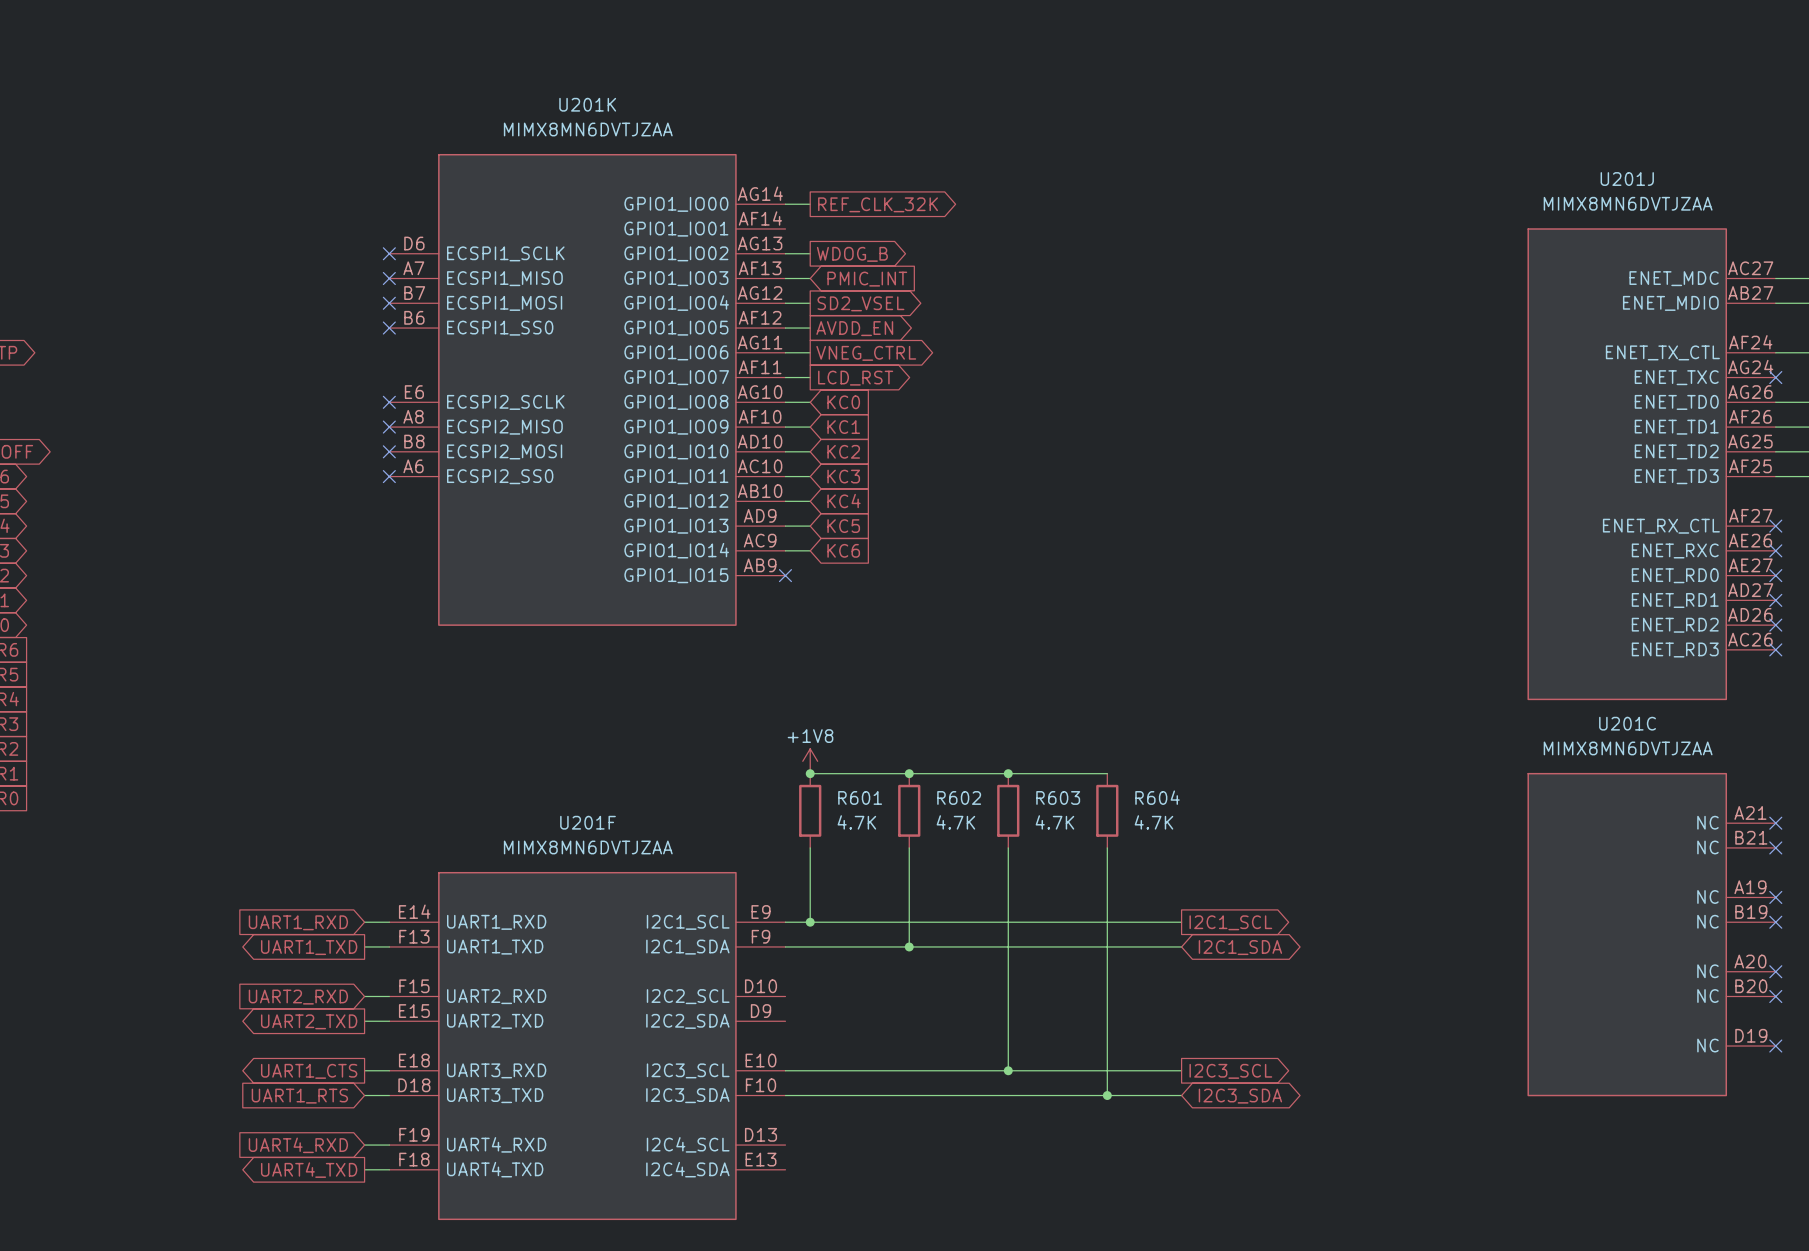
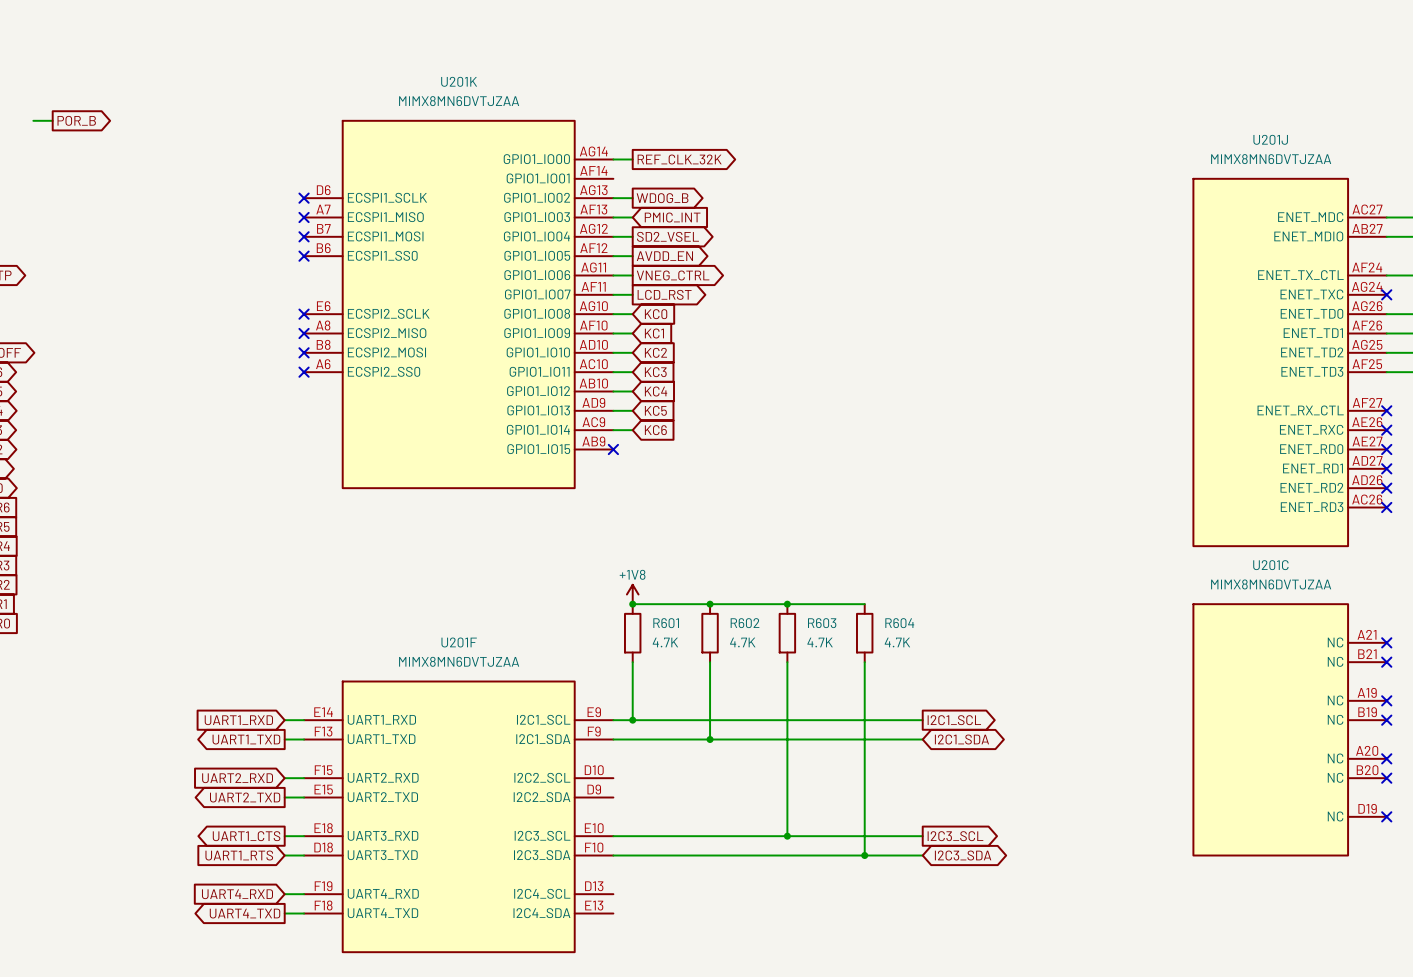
wire: none -> (33, 120) (52, 120)
global label: none -> POR_B (76, 120)

